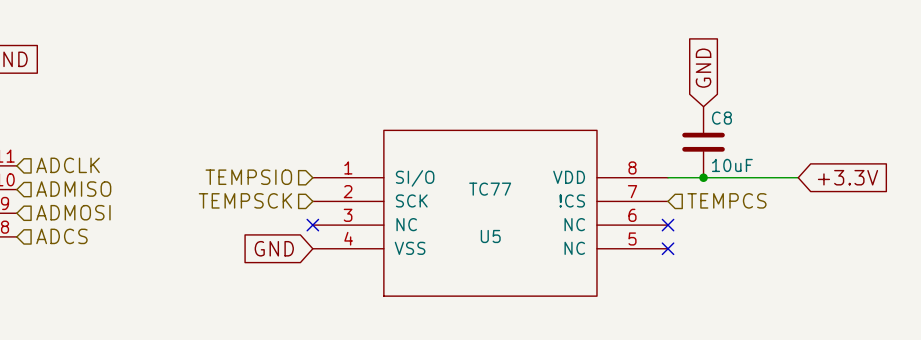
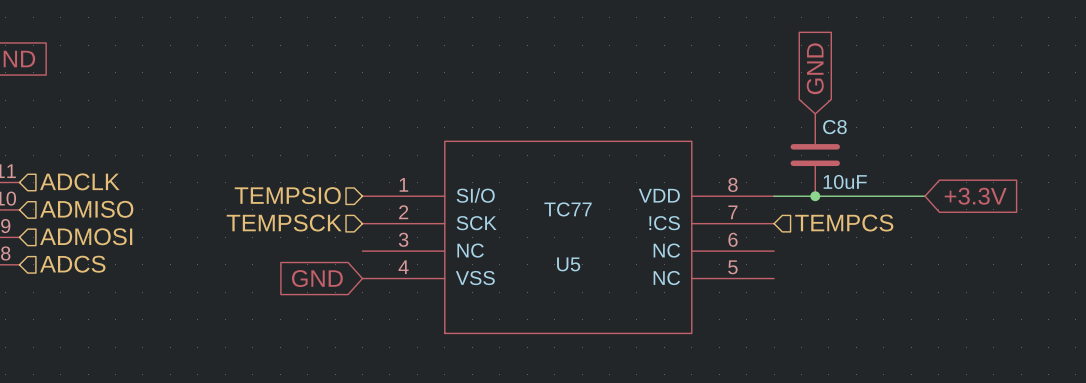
no-connect mark: (312, 225) -> none
no-connect mark: (668, 225) -> none
no-connect mark: (668, 248) -> none

